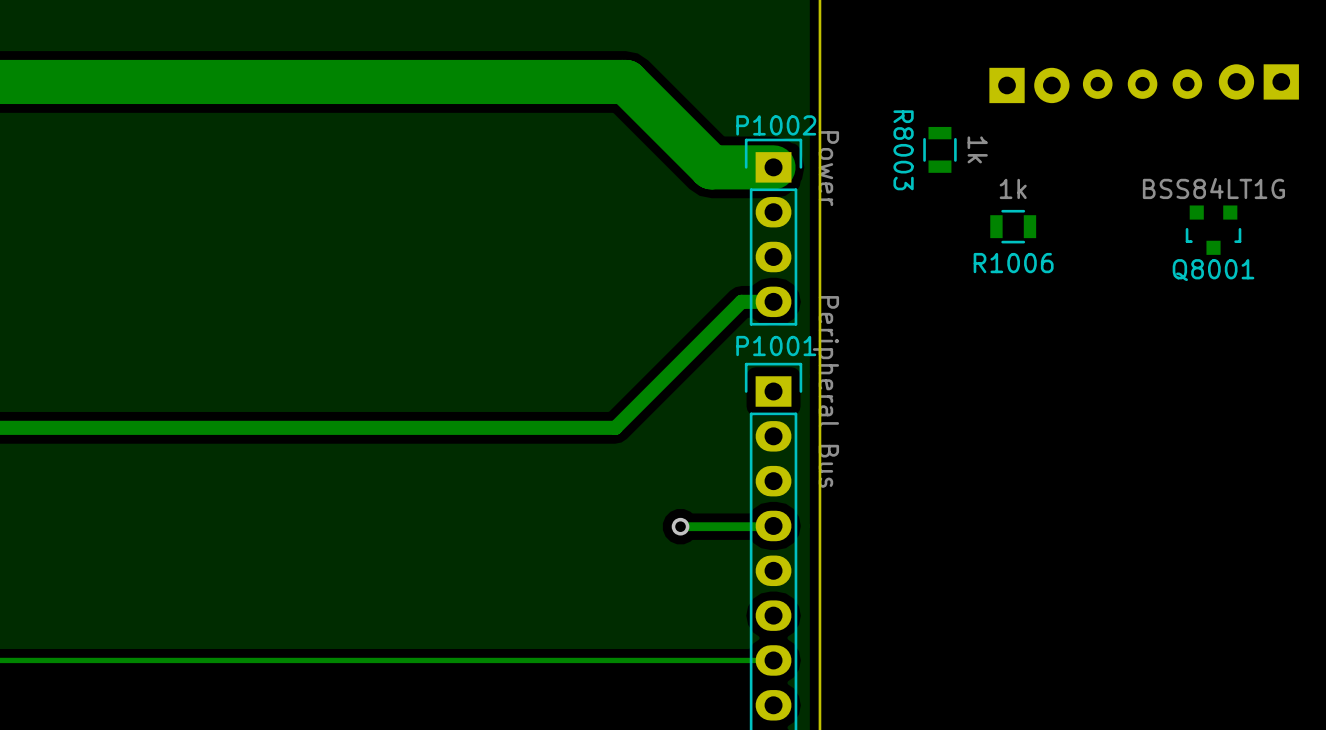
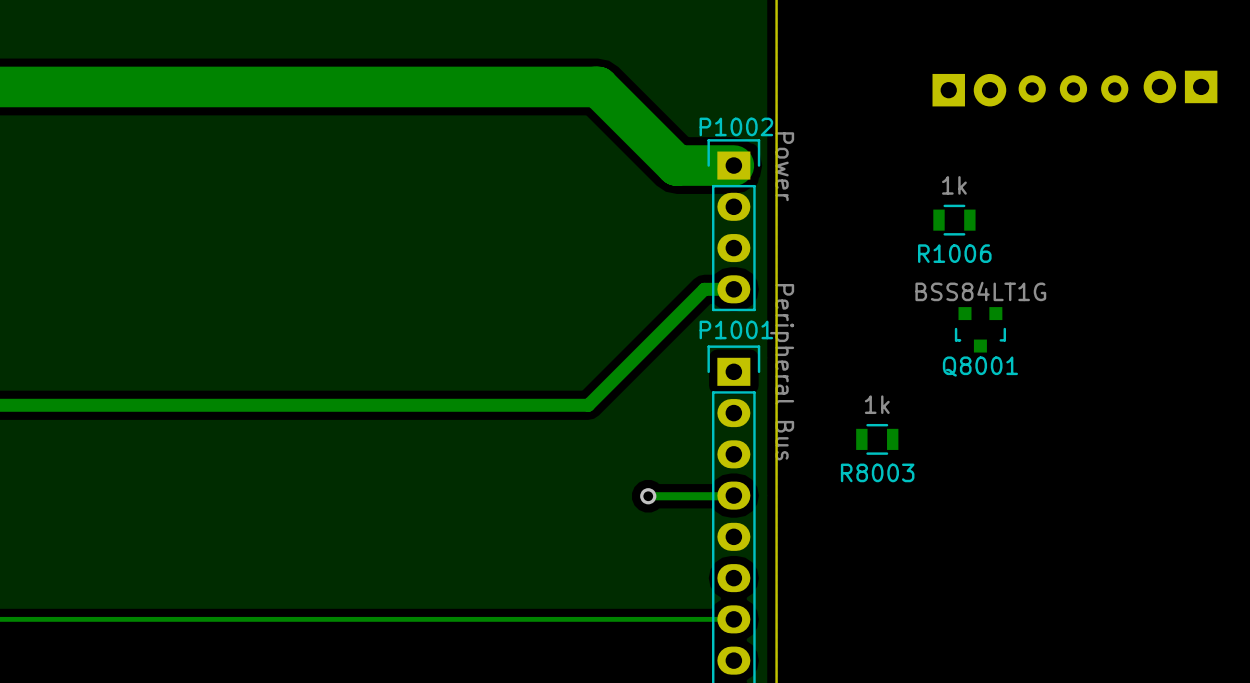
R8003 rotation: 0° (939, 149) -> 90° clockwise (877, 439)
R8003 position: (939, 149) -> (877, 439)
R8003 value position: 1k (977, 149) -> 1k (877, 404)
R8003 name position: R8003 (903, 150) -> R8003 (877, 472)
Q8001 position: (1213, 230) -> (980, 329)

